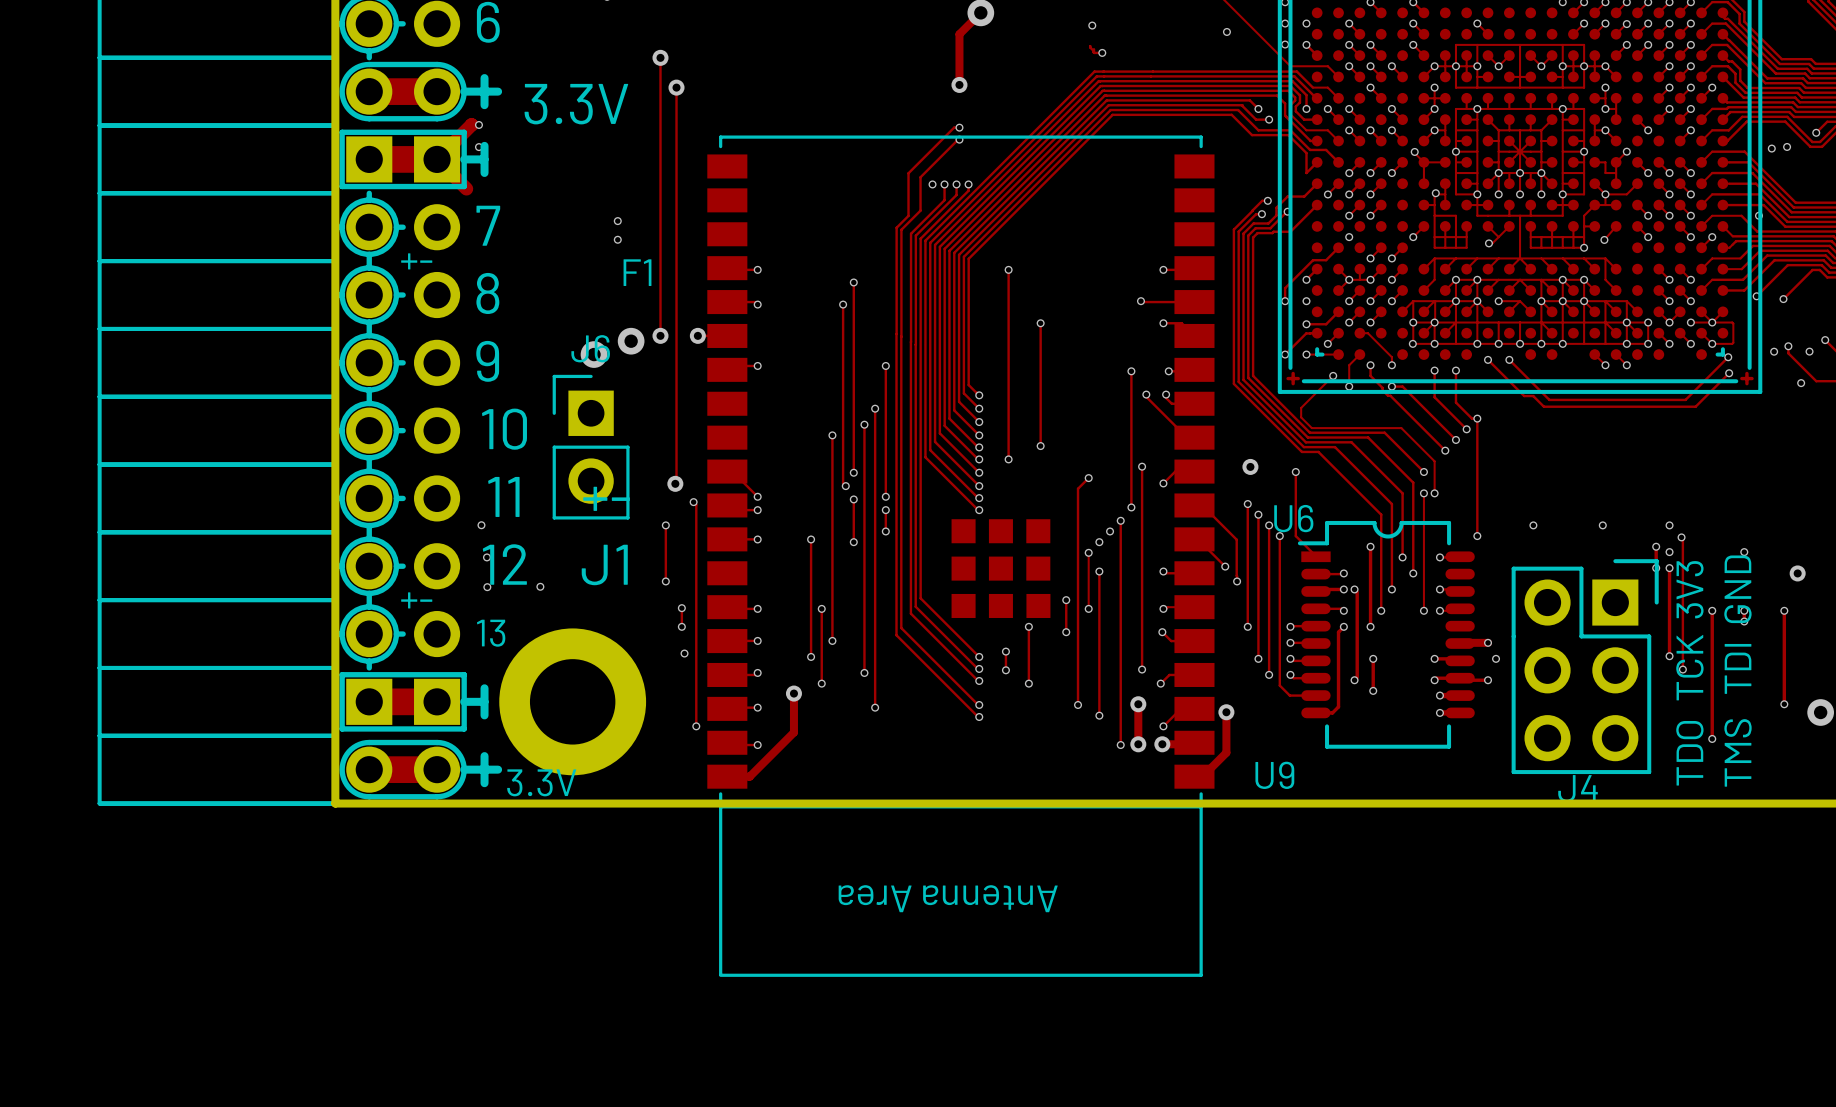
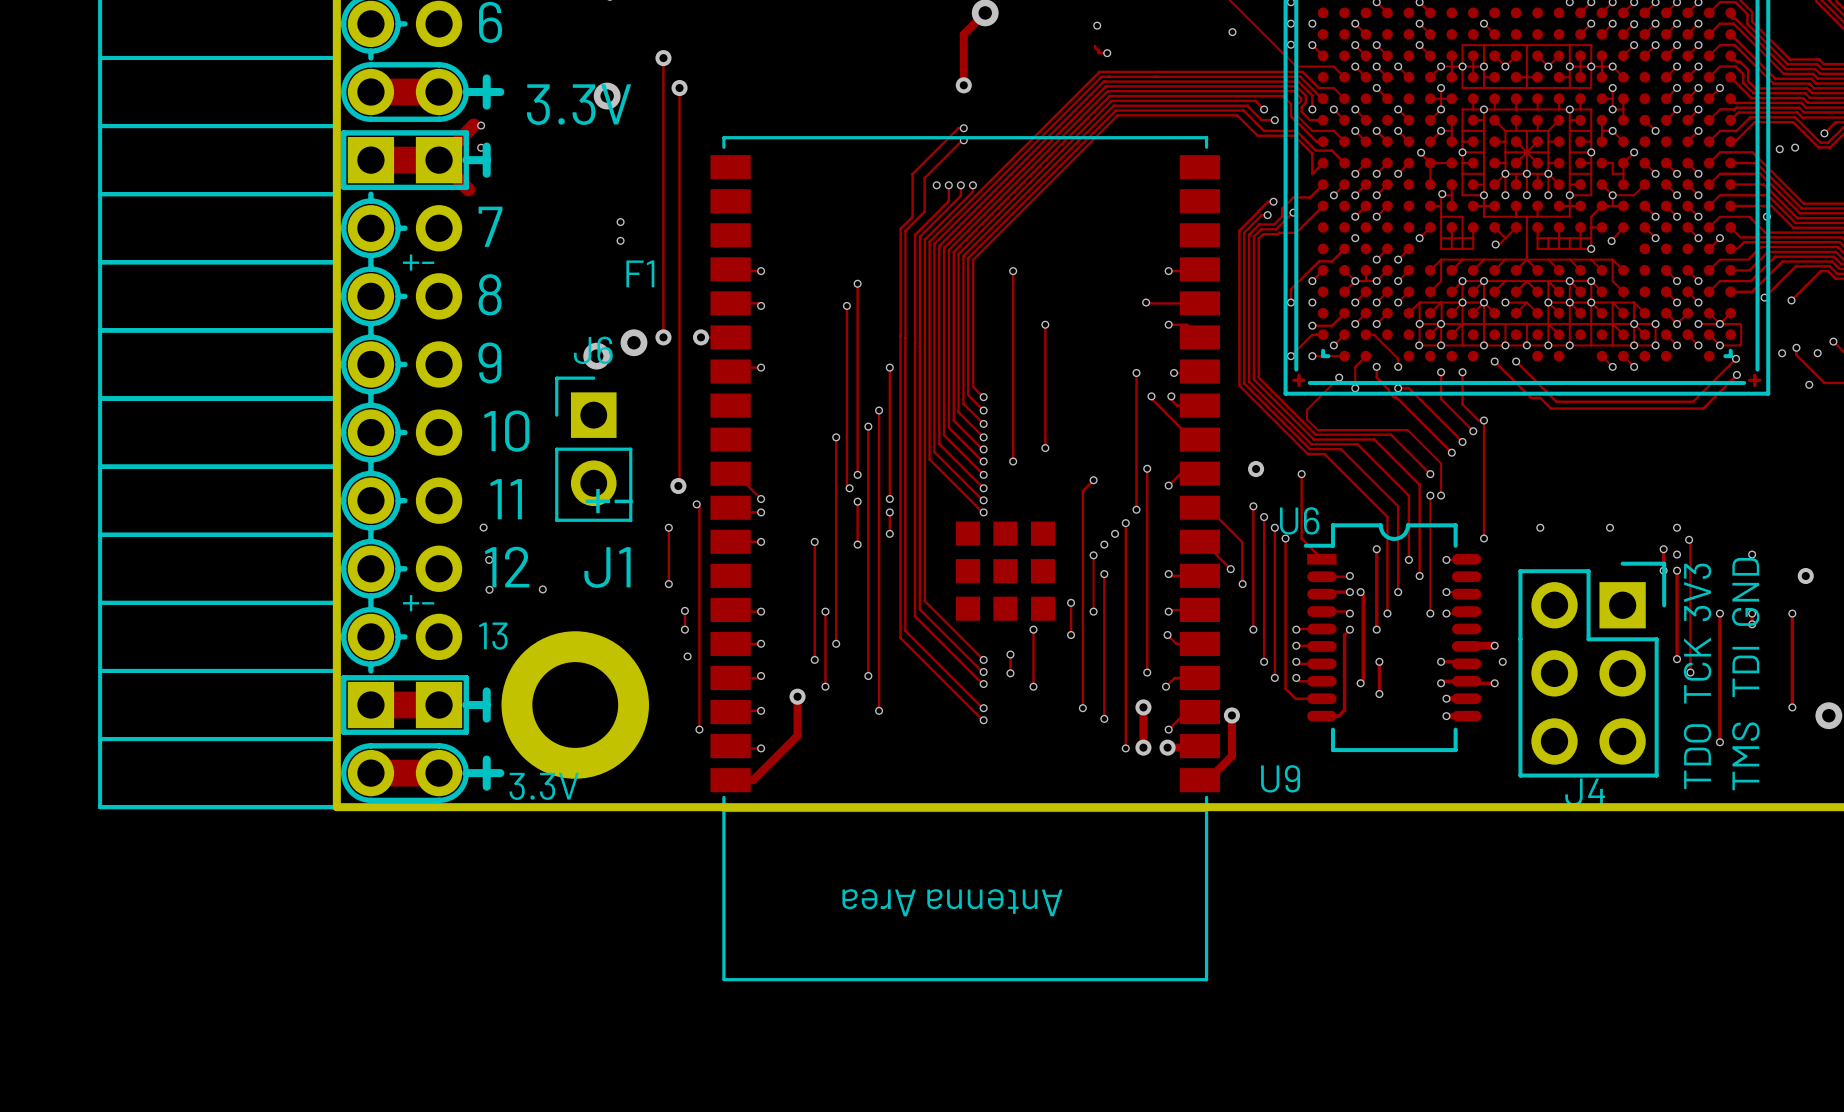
via: none -> (607, 96)

